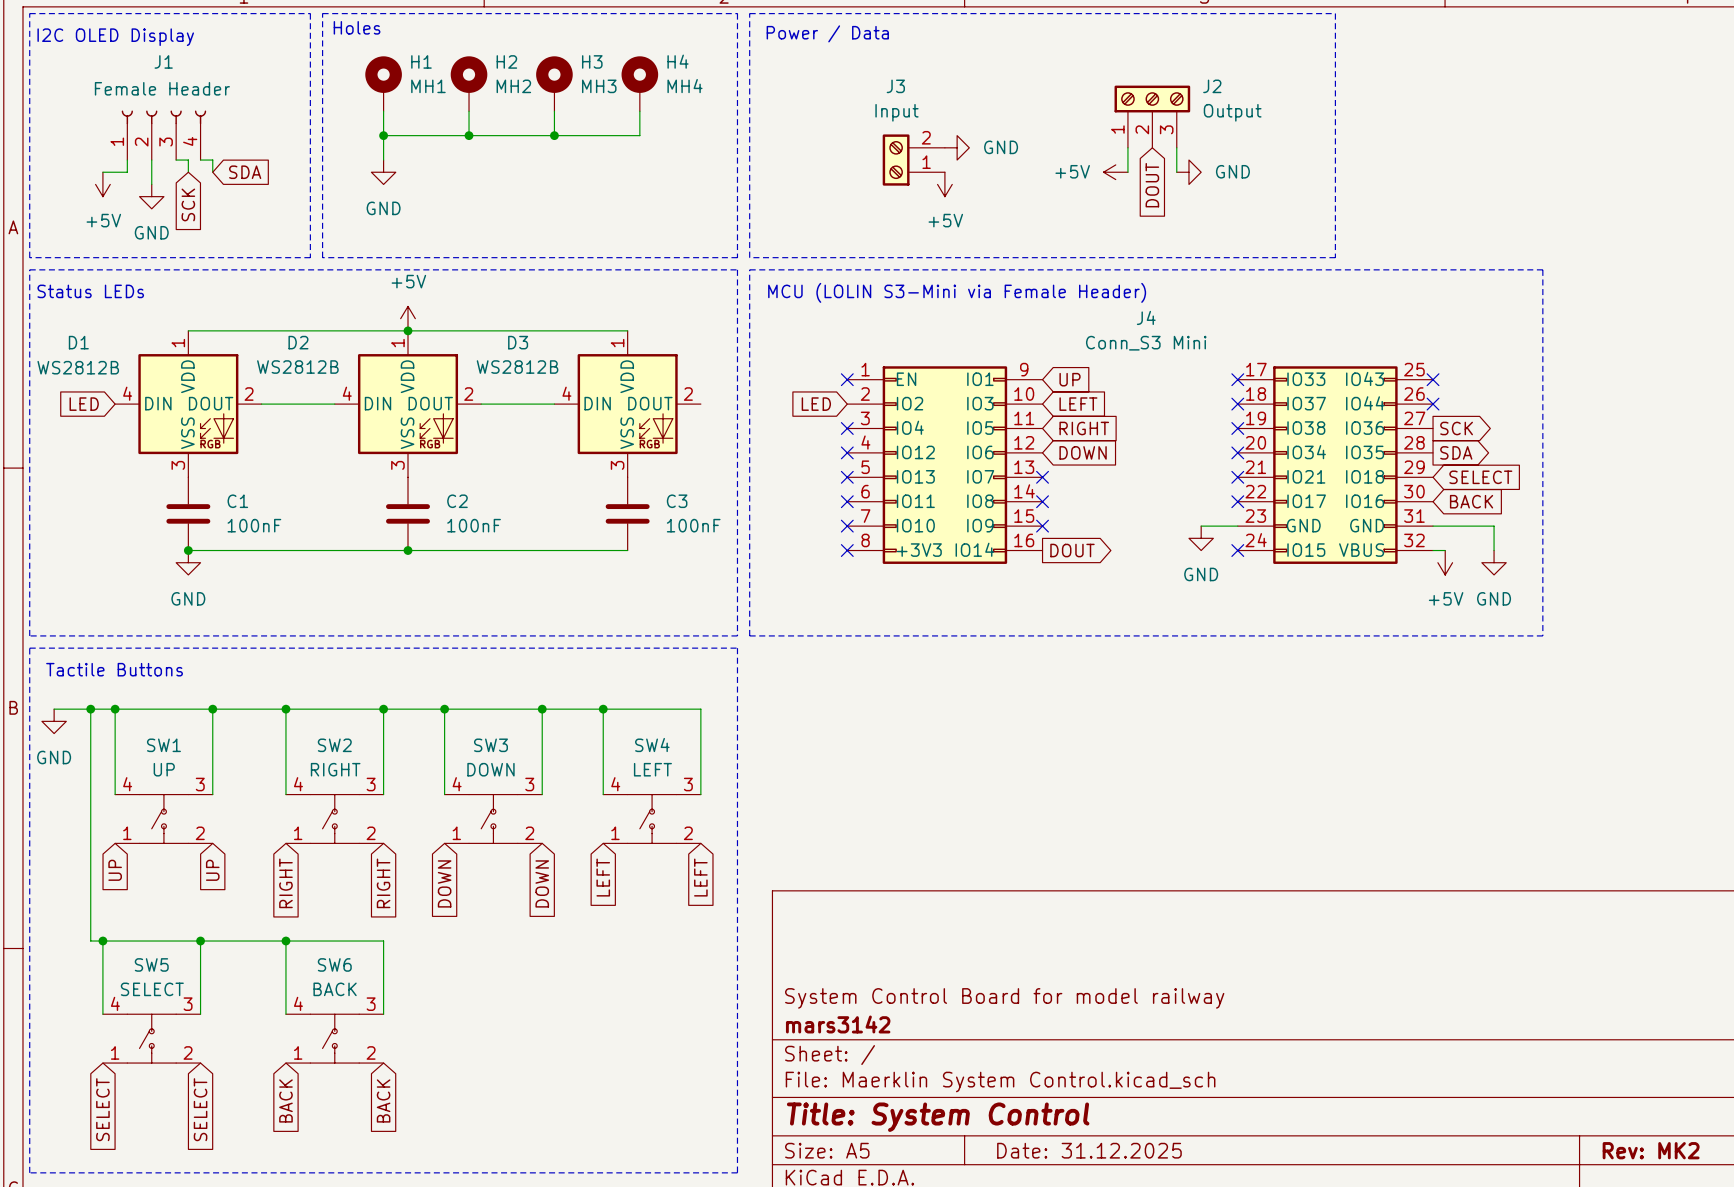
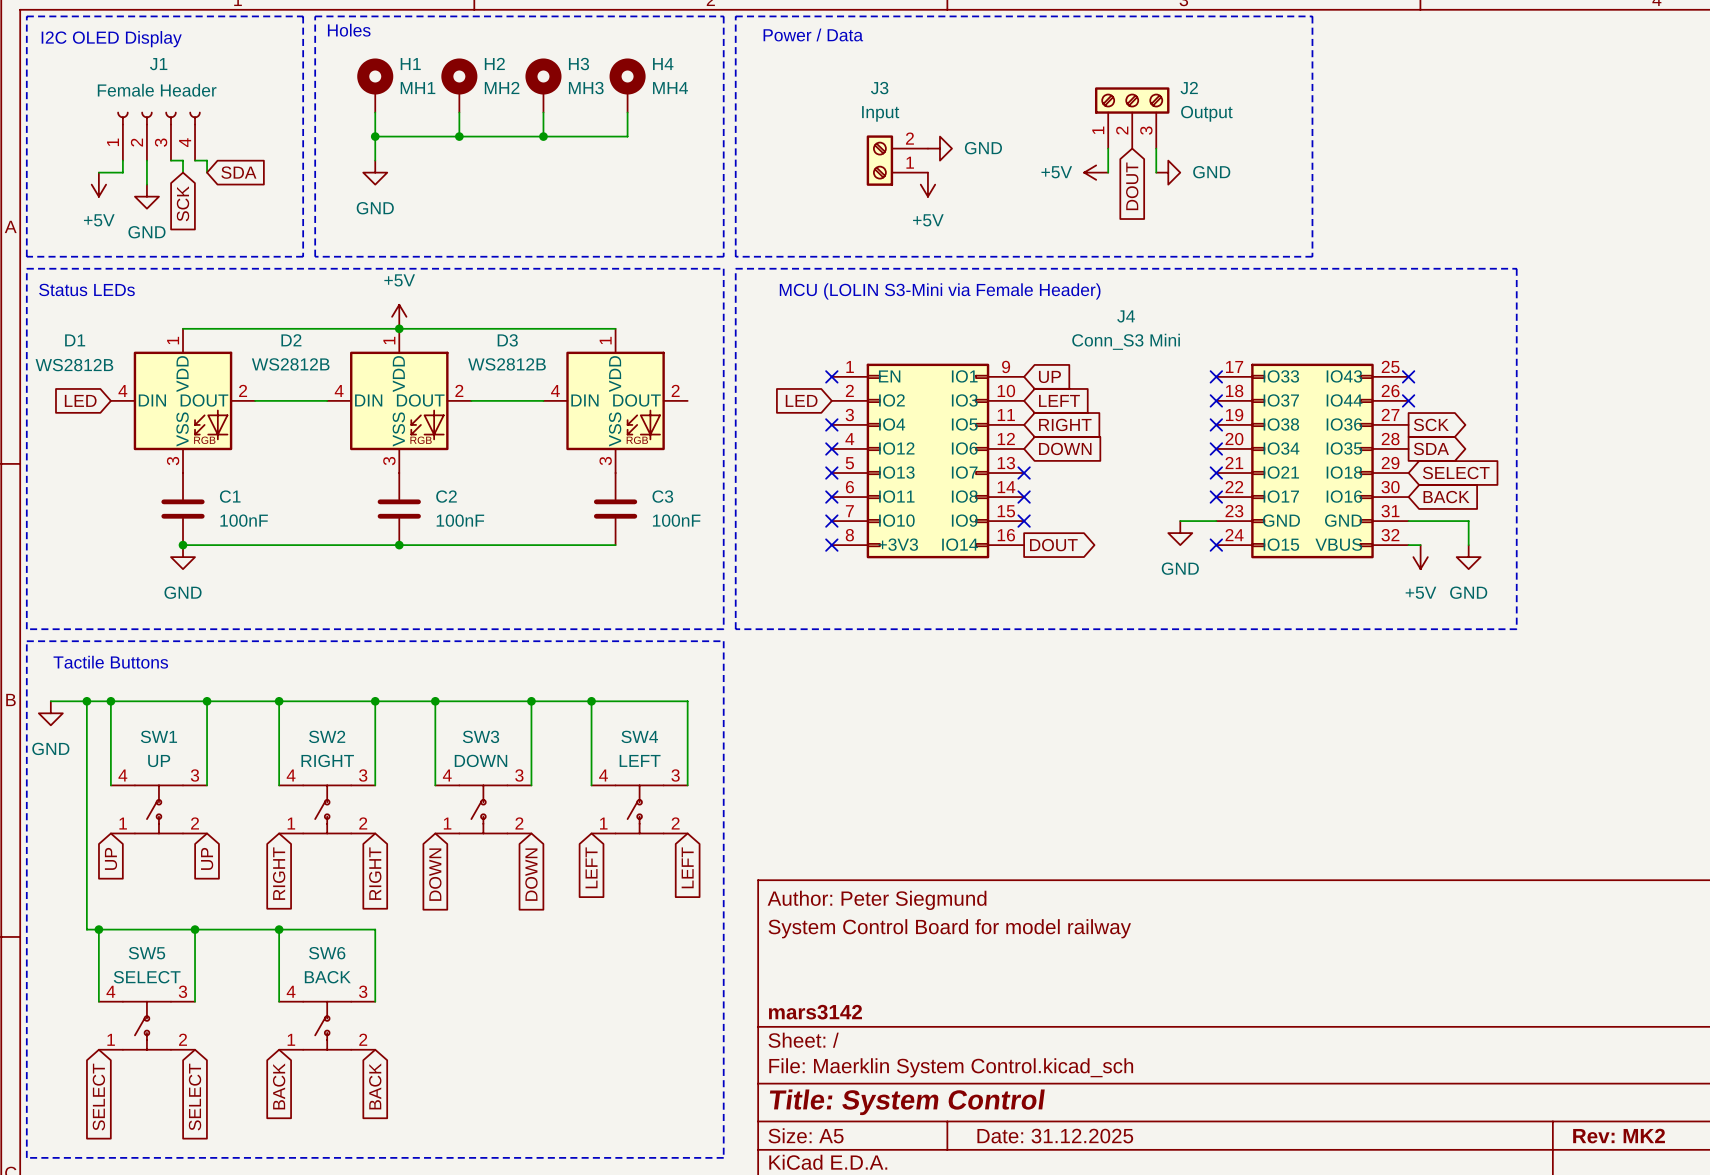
title block: none -> Author: Peter Siegmund (877, 900)
title block position: System Control Board for model railway (1004, 998) -> System Control Board for model railway (949, 928)

